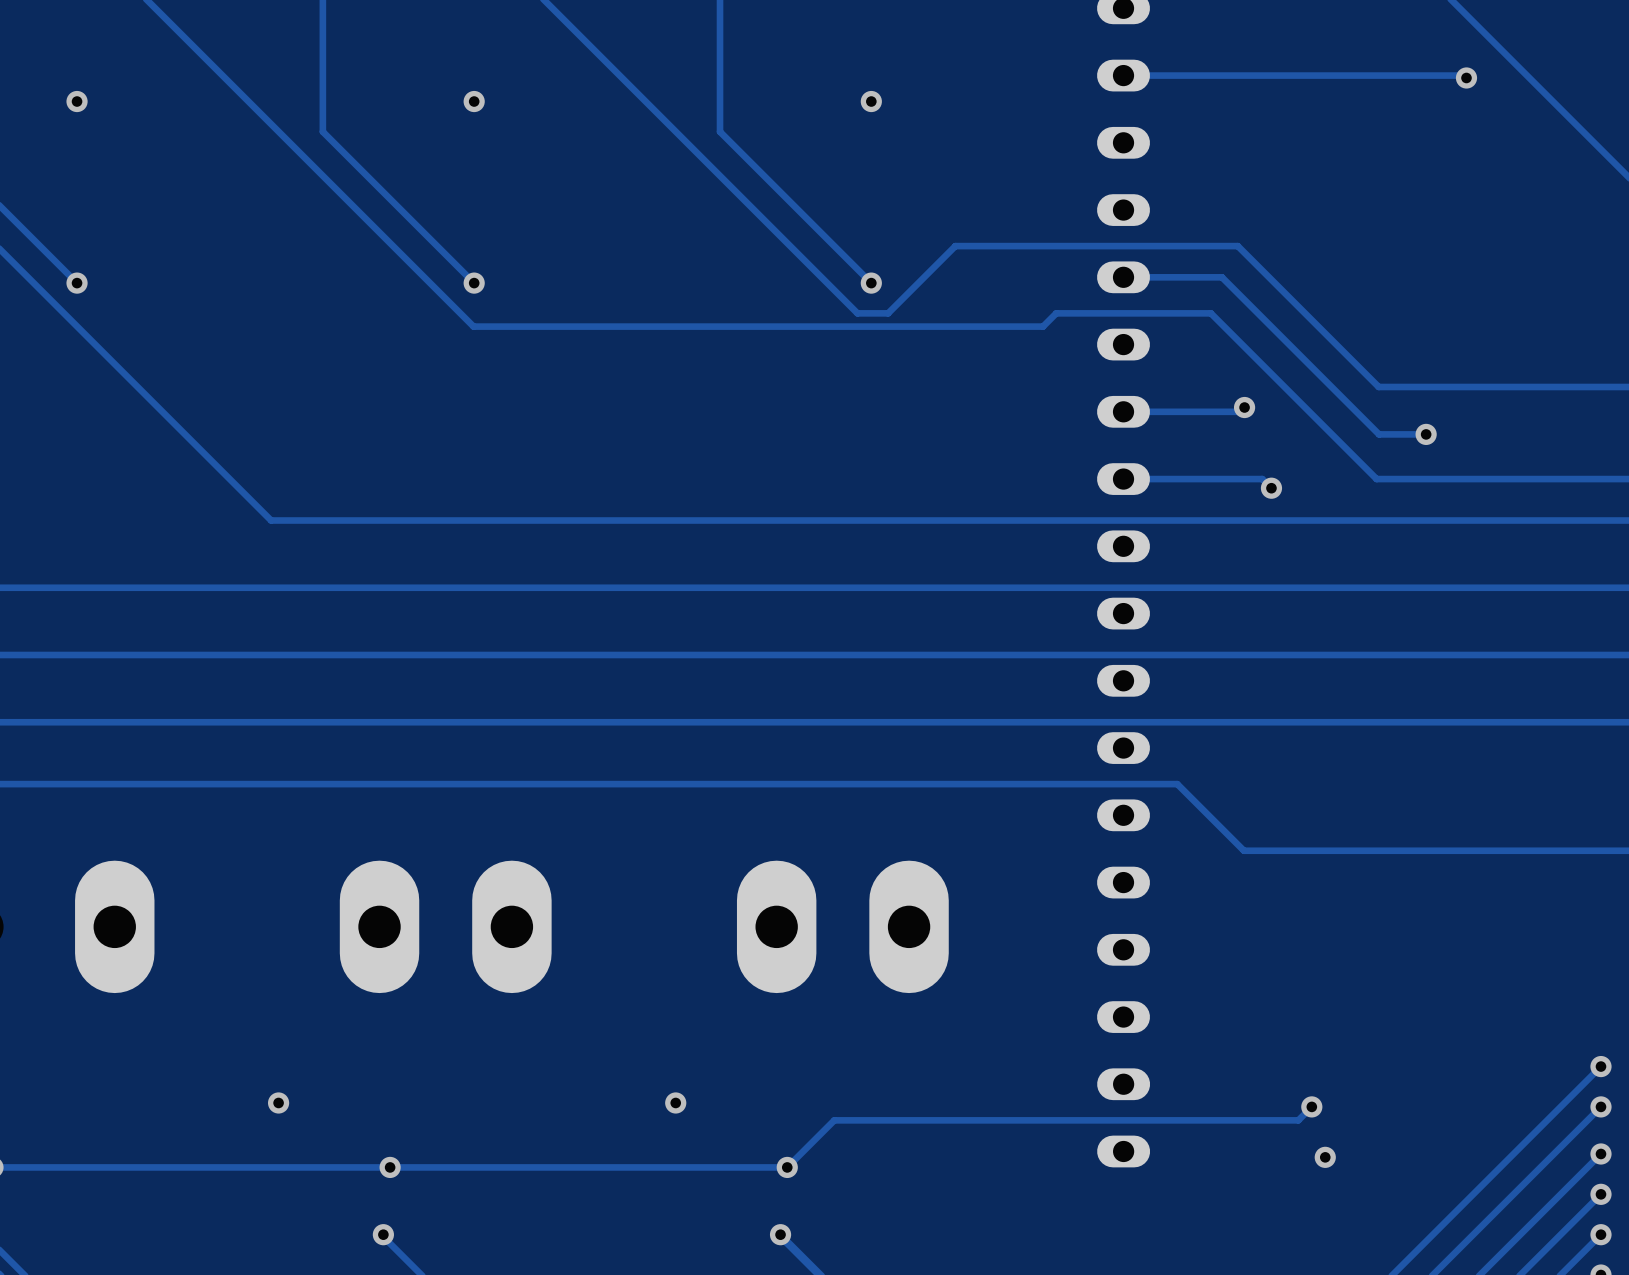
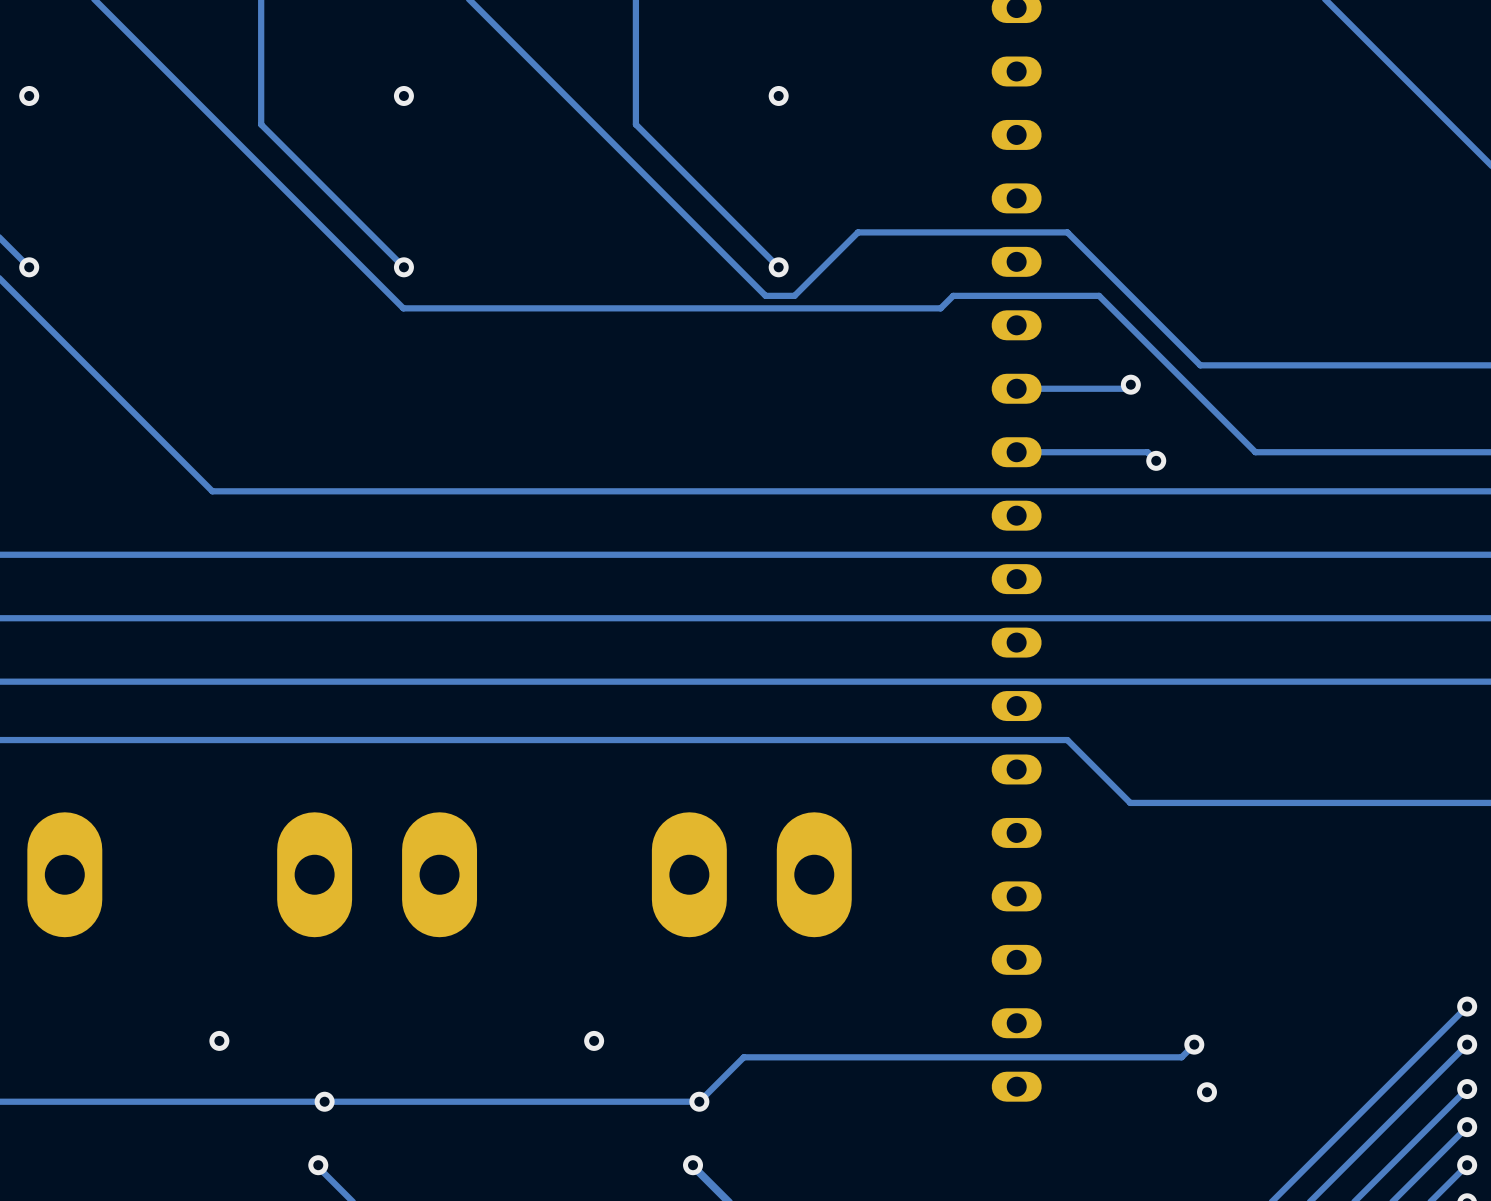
track: (1123, 75) (1464, 75) (1466, 77) -> none
via: (1466, 77) -> none
track: (1177, 246) (1237, 246) (1378, 386) -> (1067, 232) (1200, 365) (1257, 365)
track: (1123, 277) (1221, 277) (1379, 434) (1426, 434) -> none
via: (1426, 434) -> none

